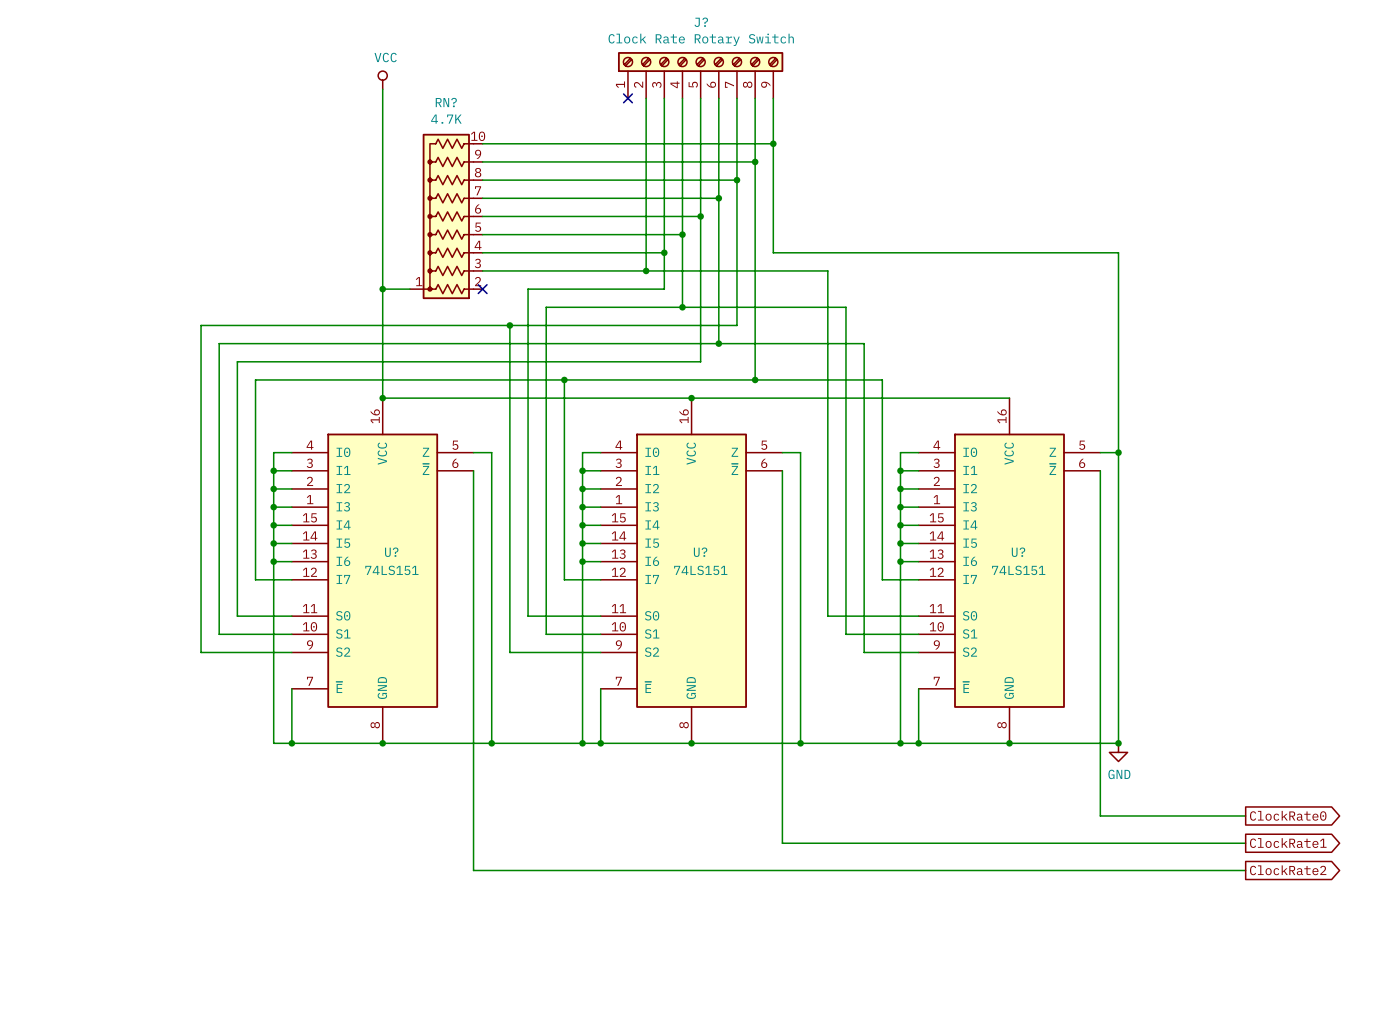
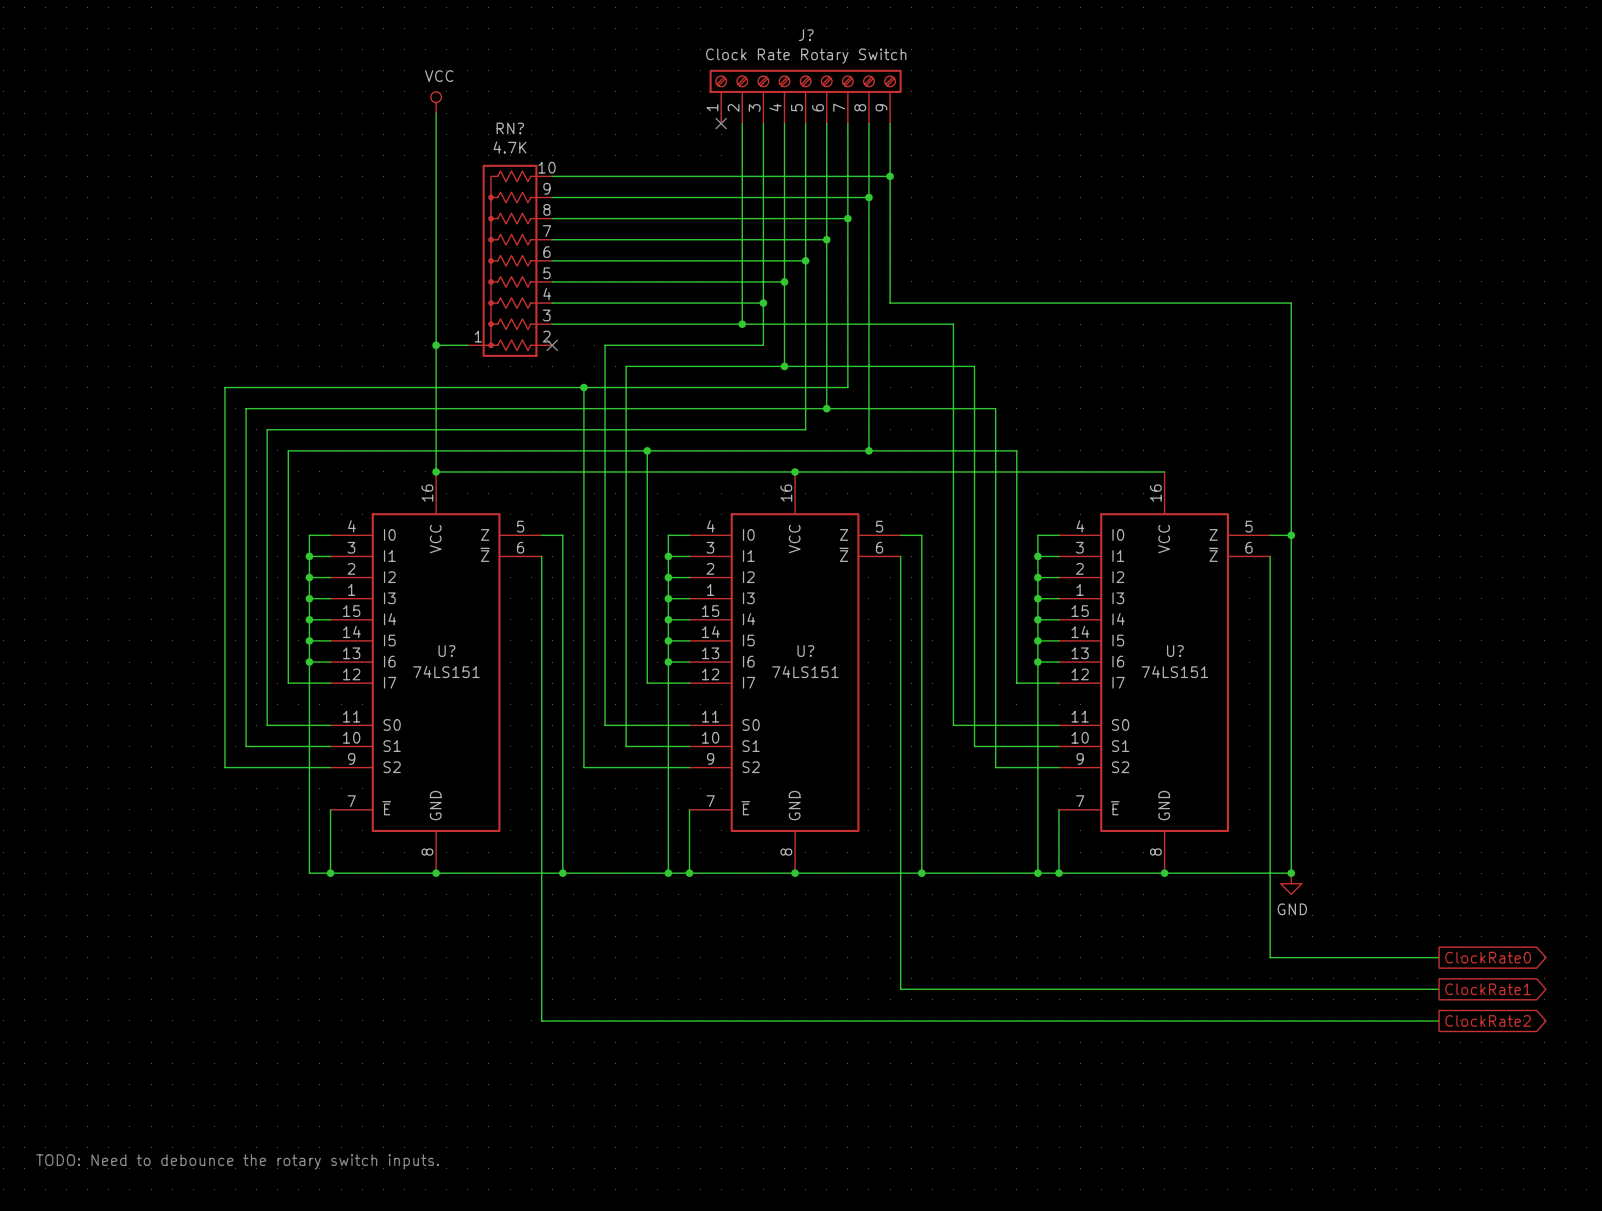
text: none -> TODO: Need to debounce the rotary switch inputs. (237, 1161)

